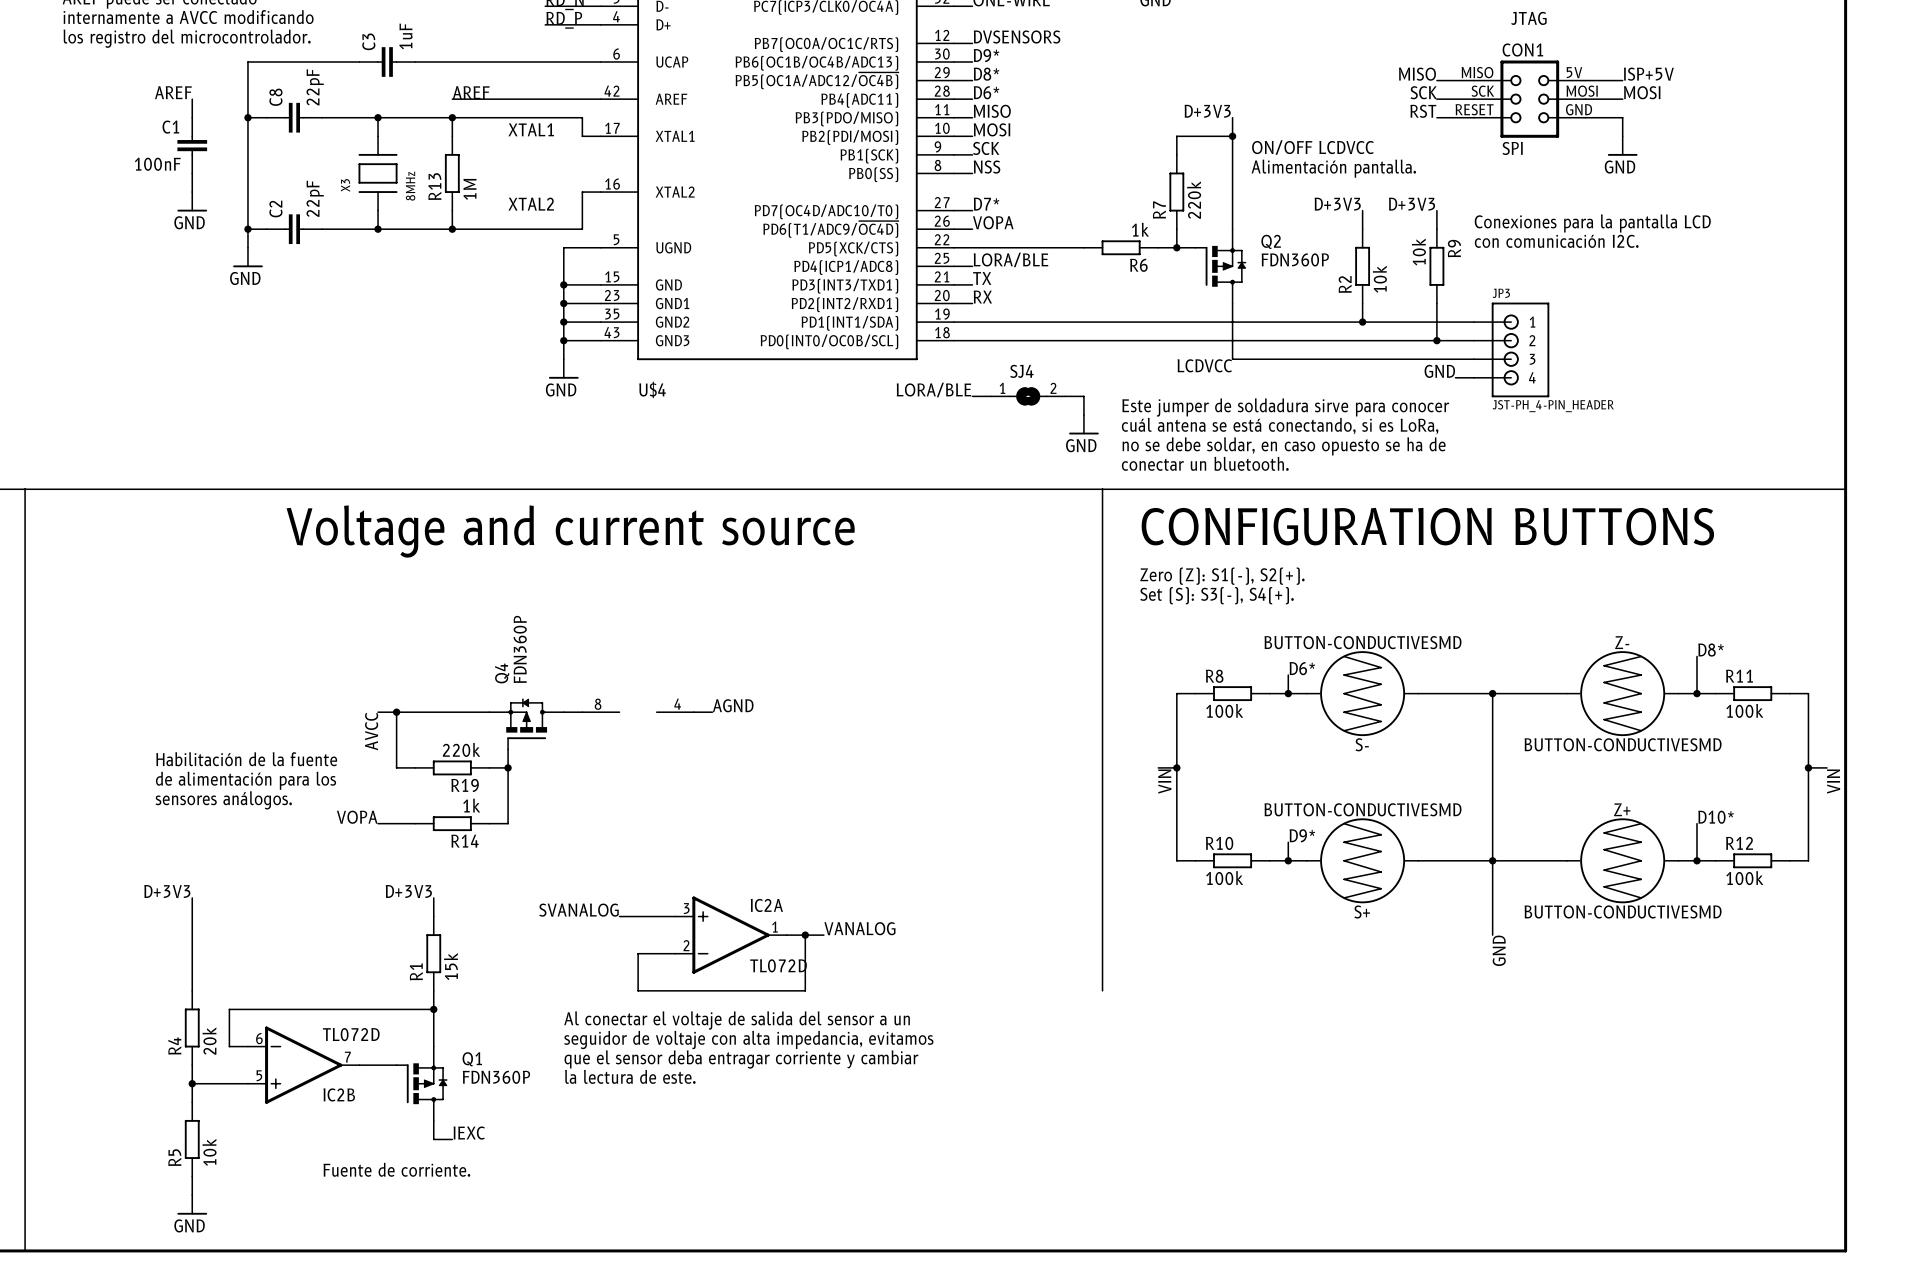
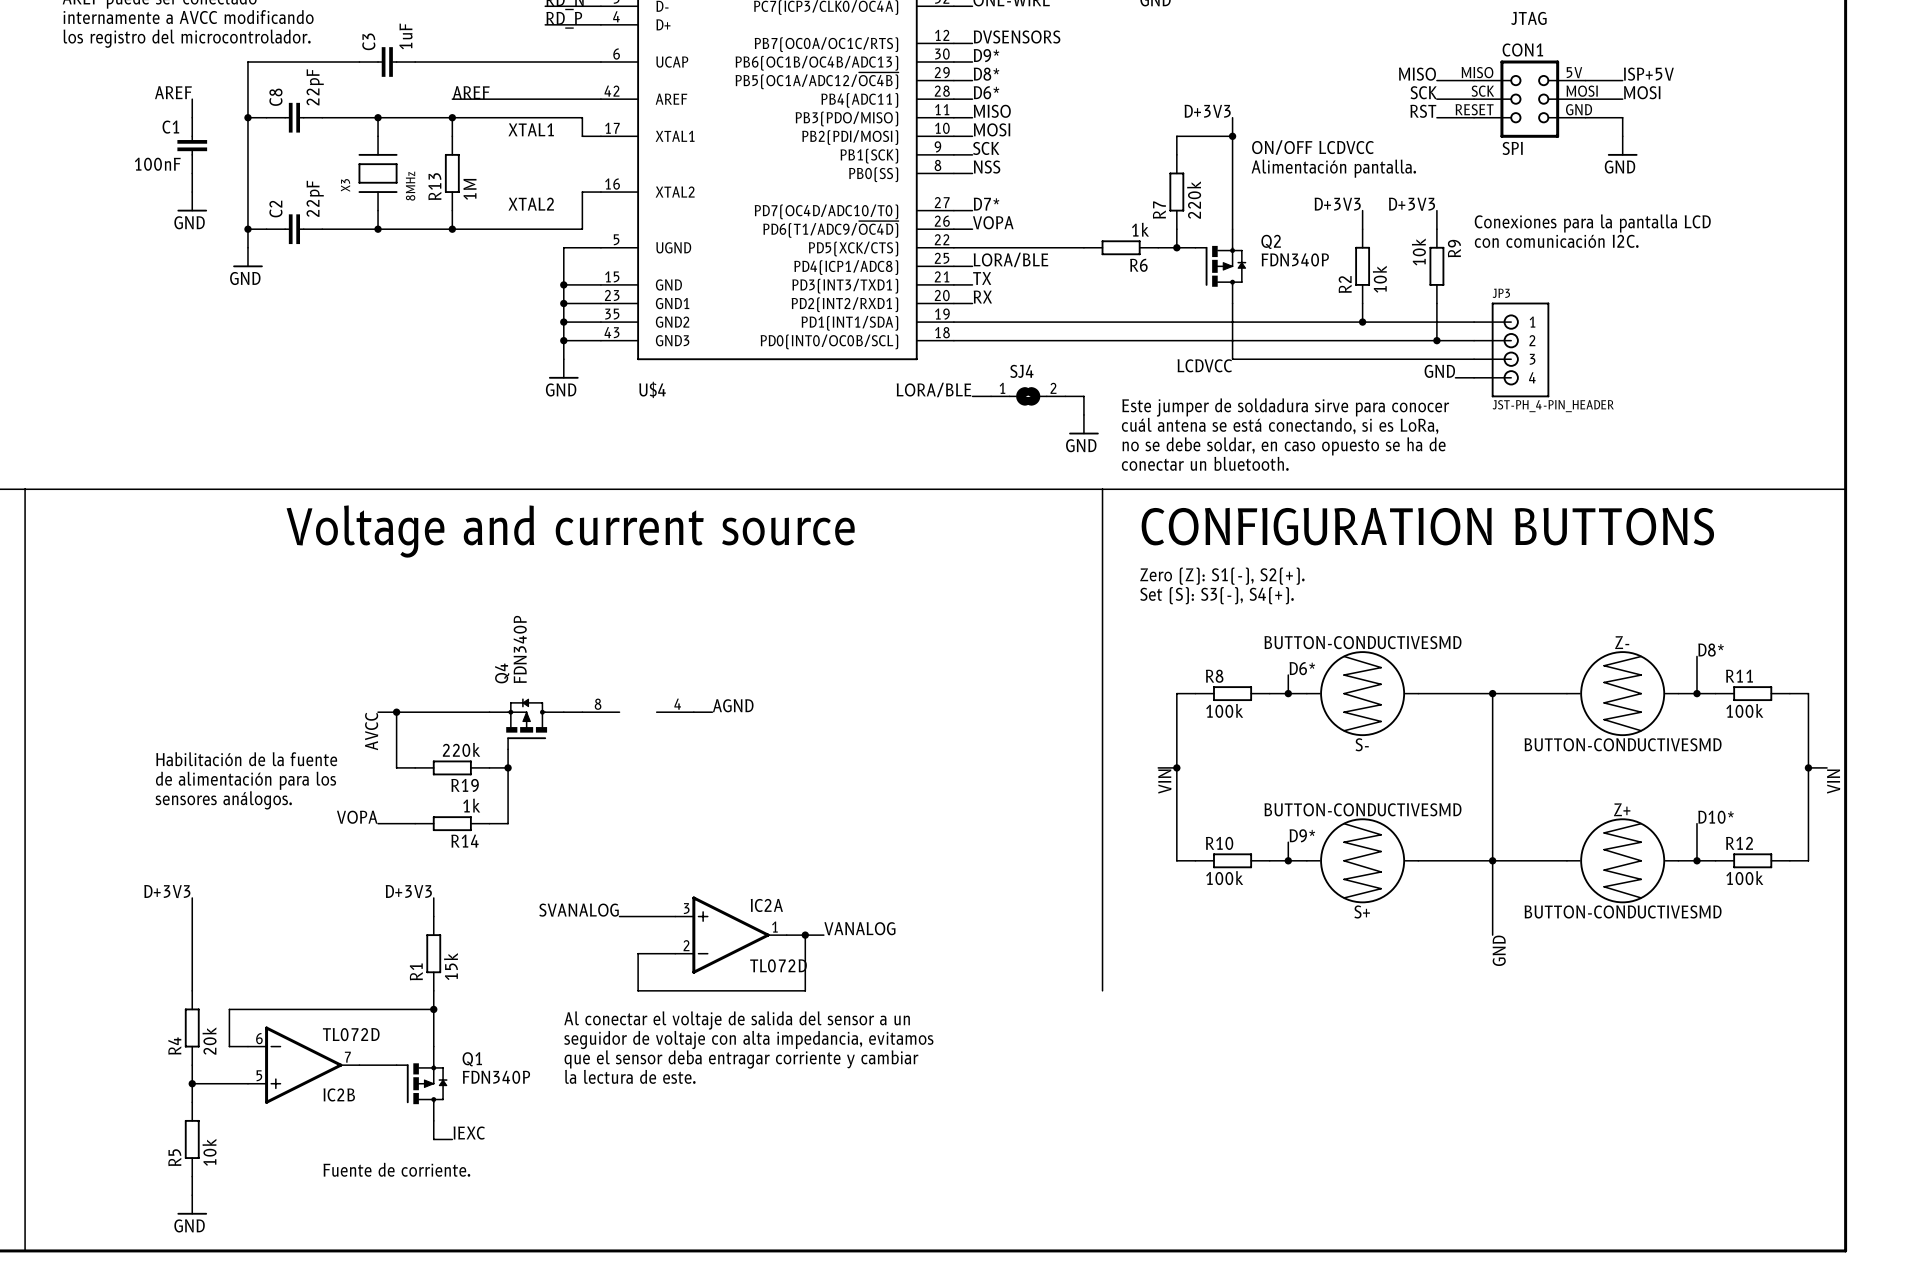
Q2 value: FDN360P (1295, 259) -> FDN340P (1295, 259)
Q4 value: FDN360P (520, 649) -> FDN340P (520, 649)
Q1 value: FDN360P (496, 1077) -> FDN340P (496, 1077)

